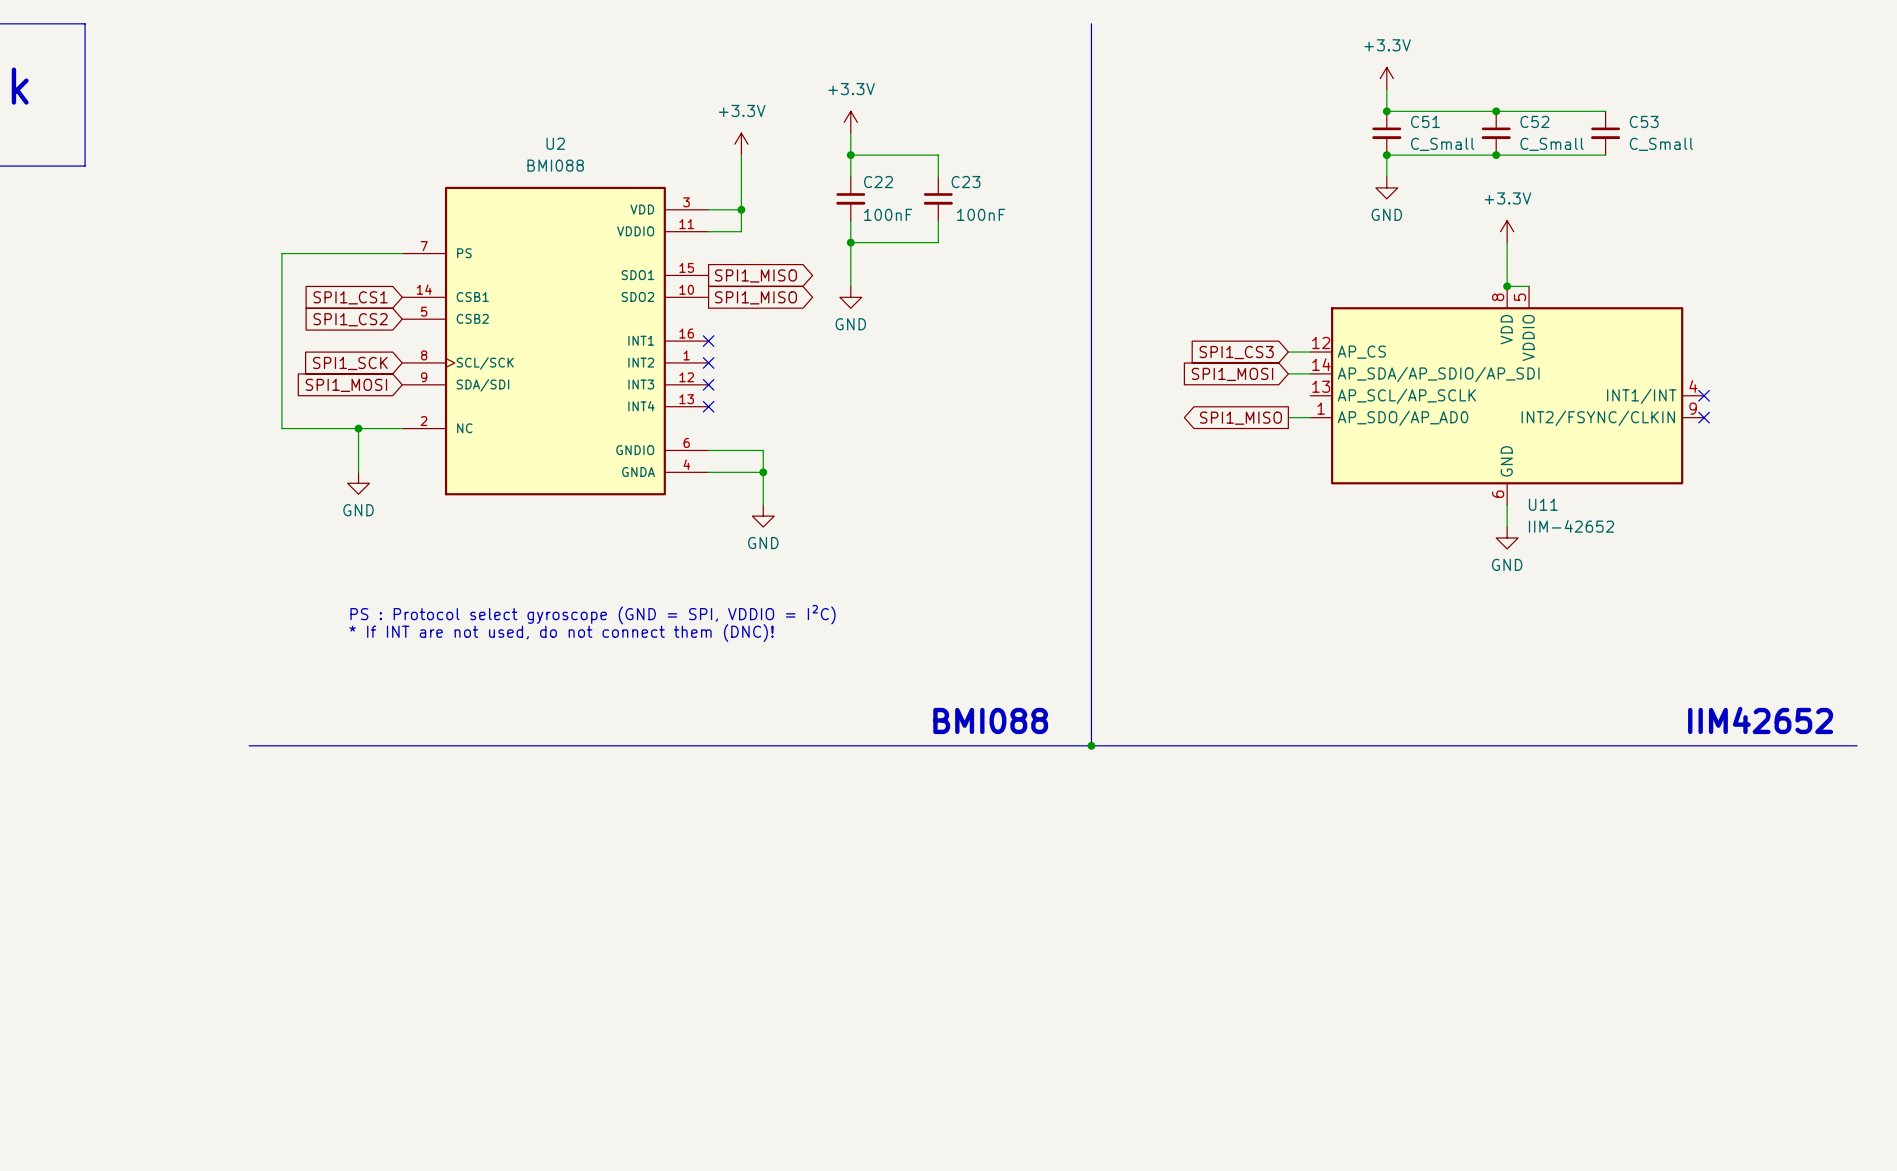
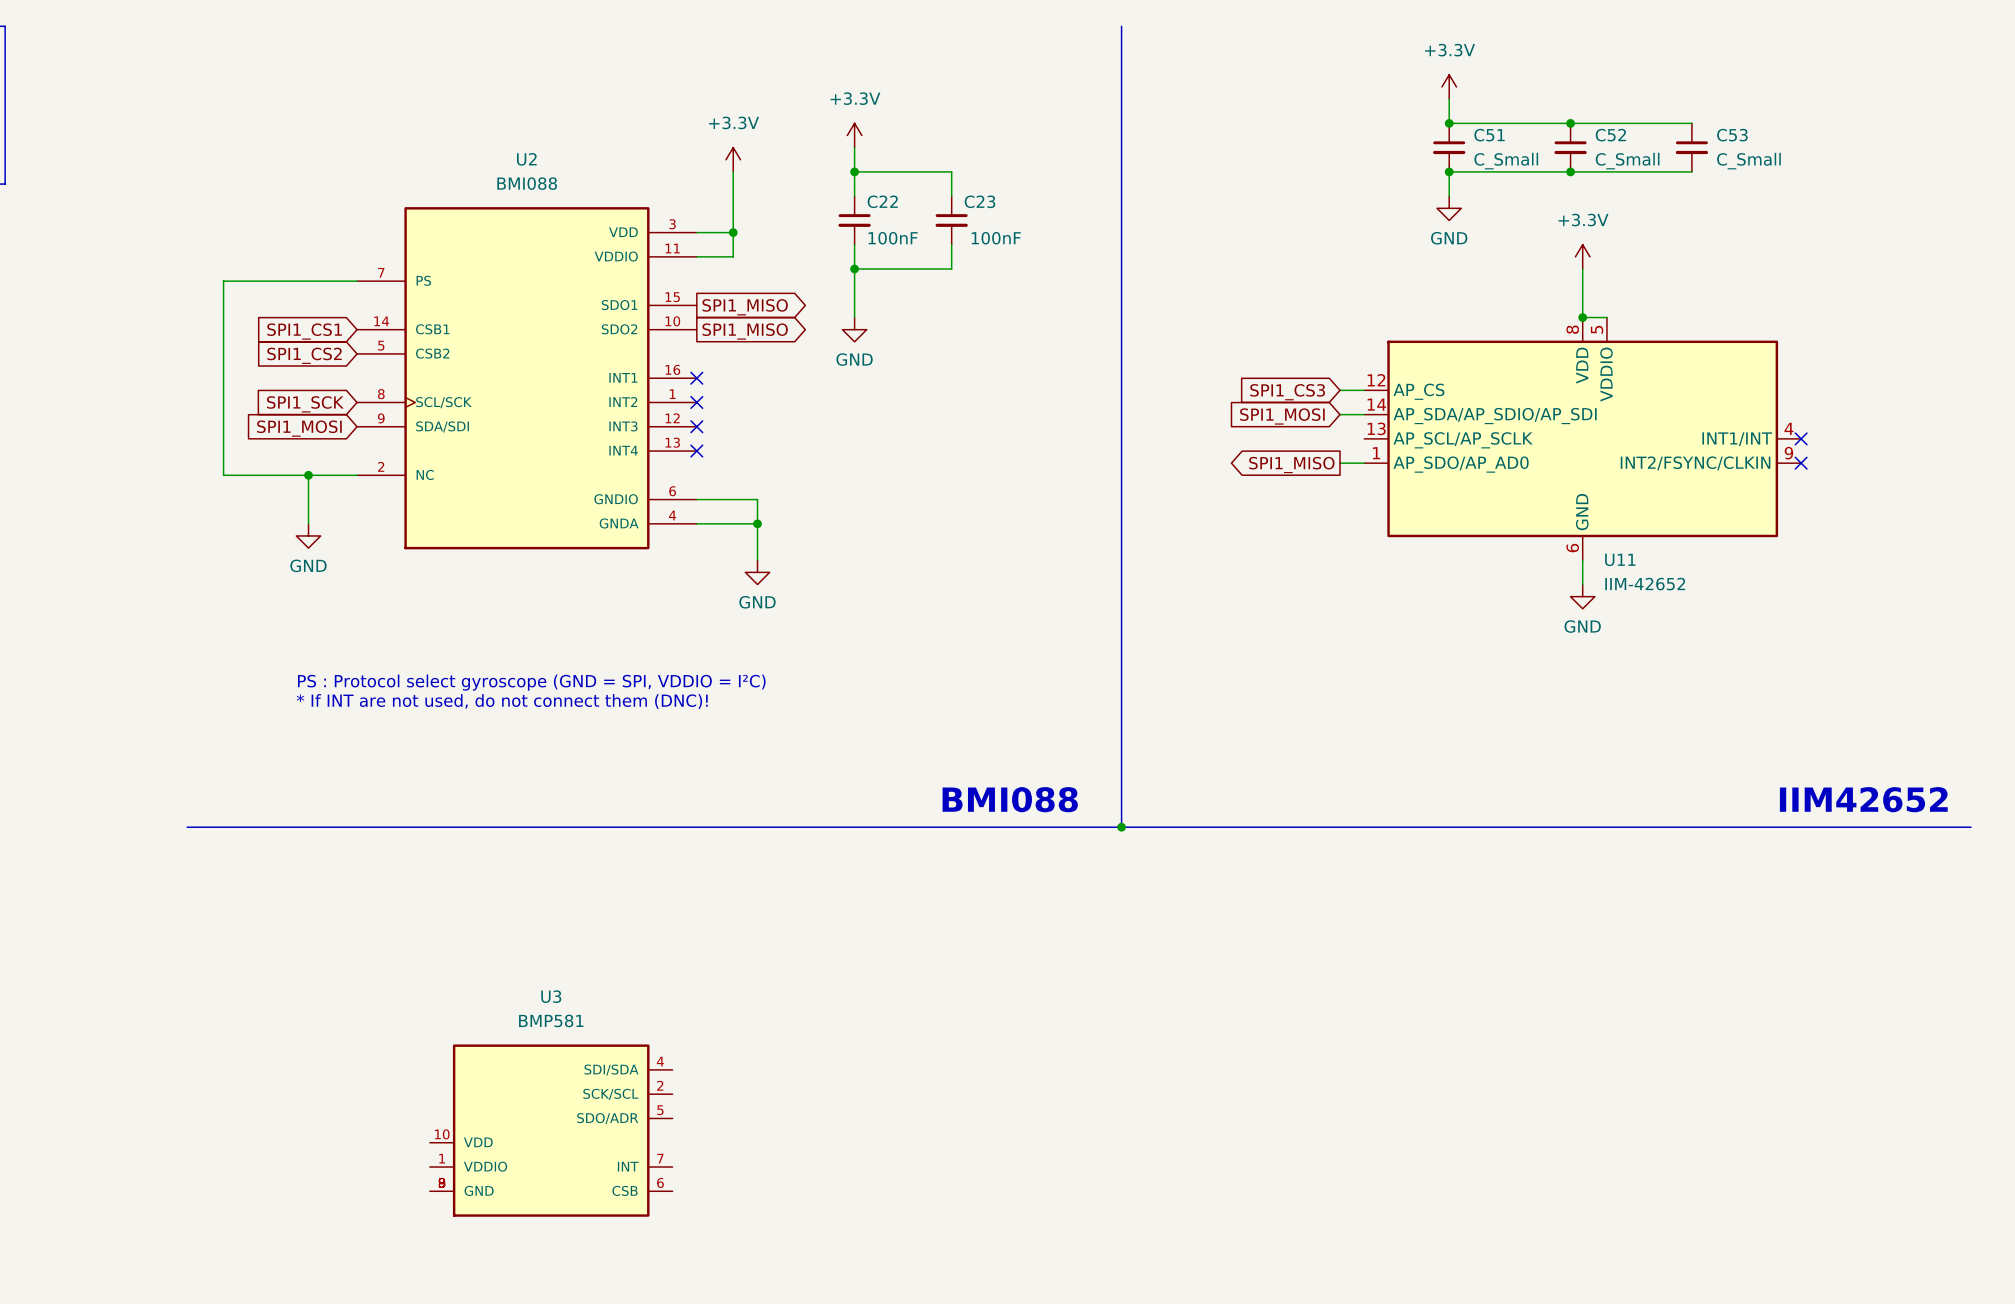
U3: none -> BMP581 (551, 1130)

